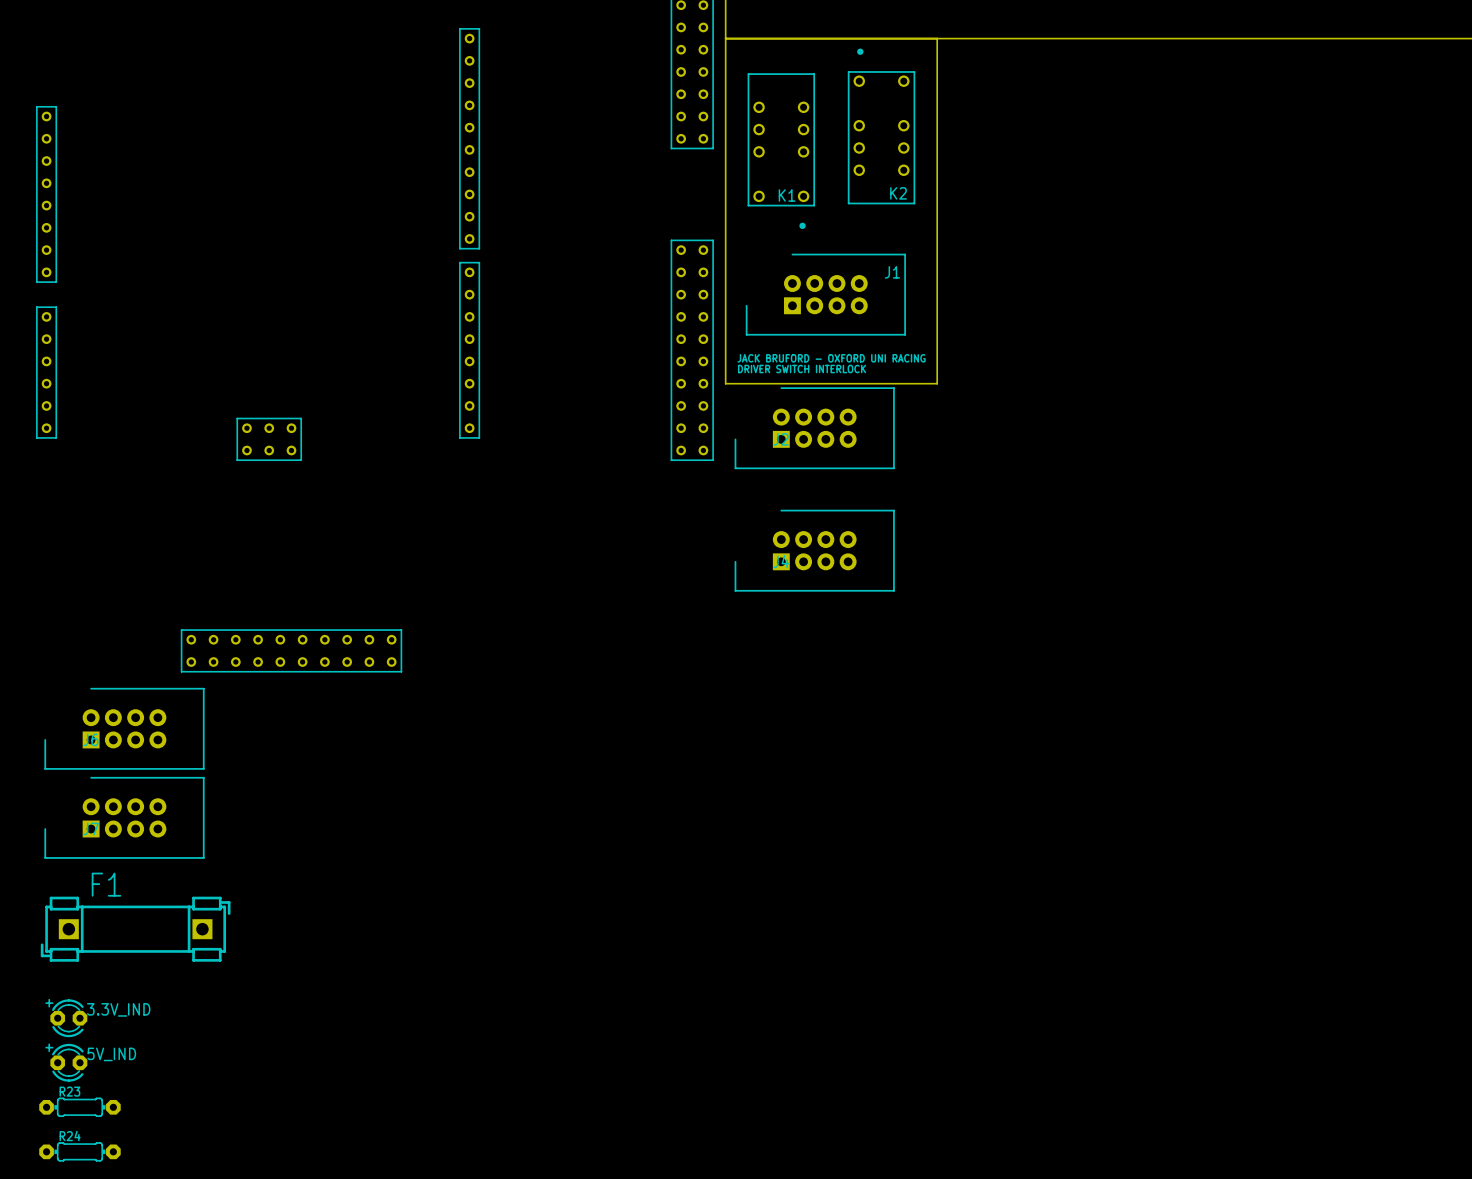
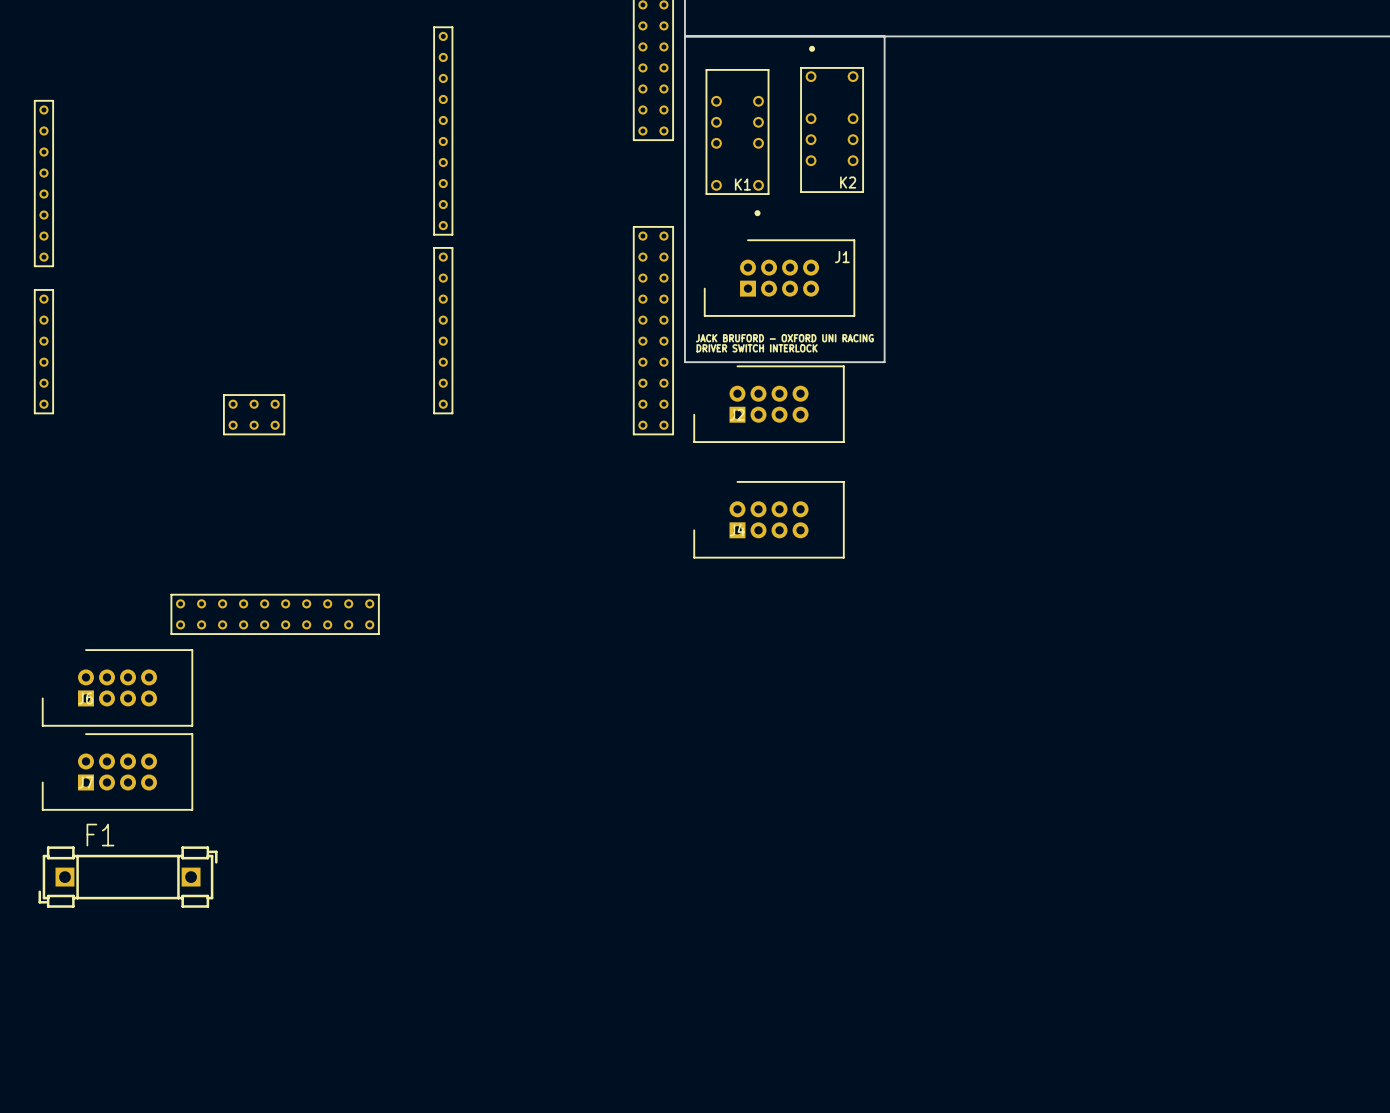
3.3V_IND: (66, 1018) -> none
5V_IND: (66, 1062) -> none
R23: (79, 1107) -> none
R24: (79, 1151) -> none

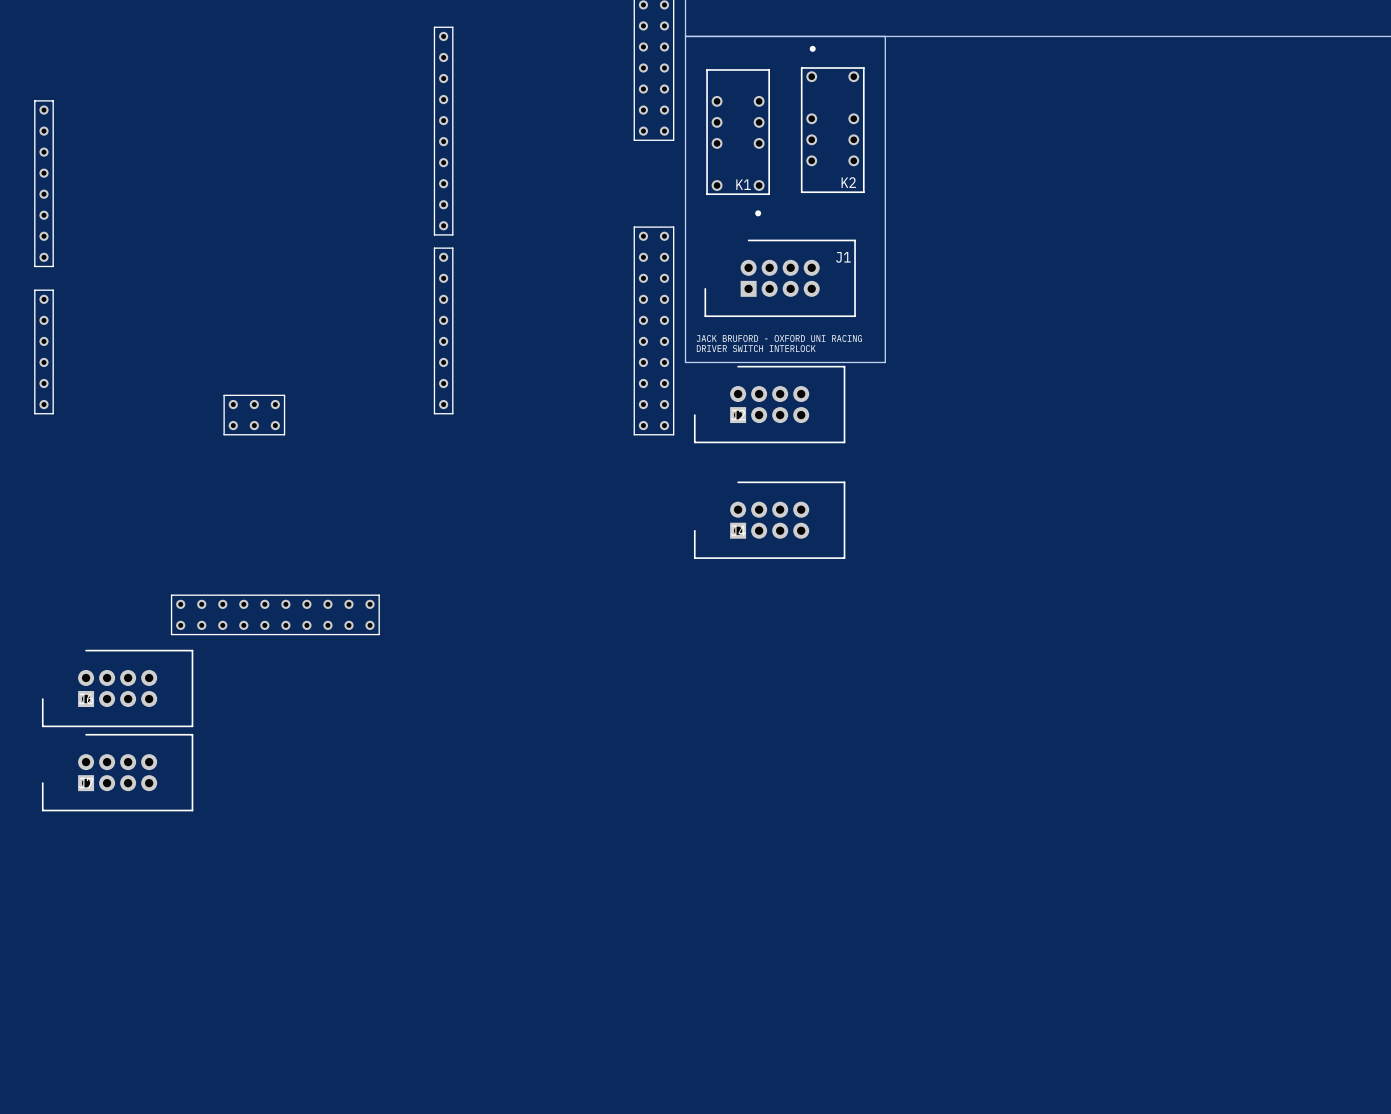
F1: (128, 877) -> none

